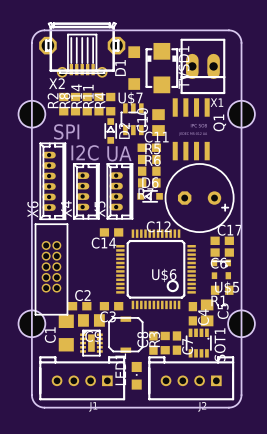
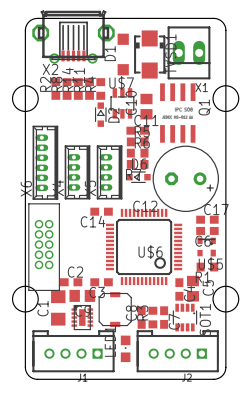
text: SPI (66, 131) -> none
text: I2C (85, 152) -> none
text: UA (119, 153) -> none

